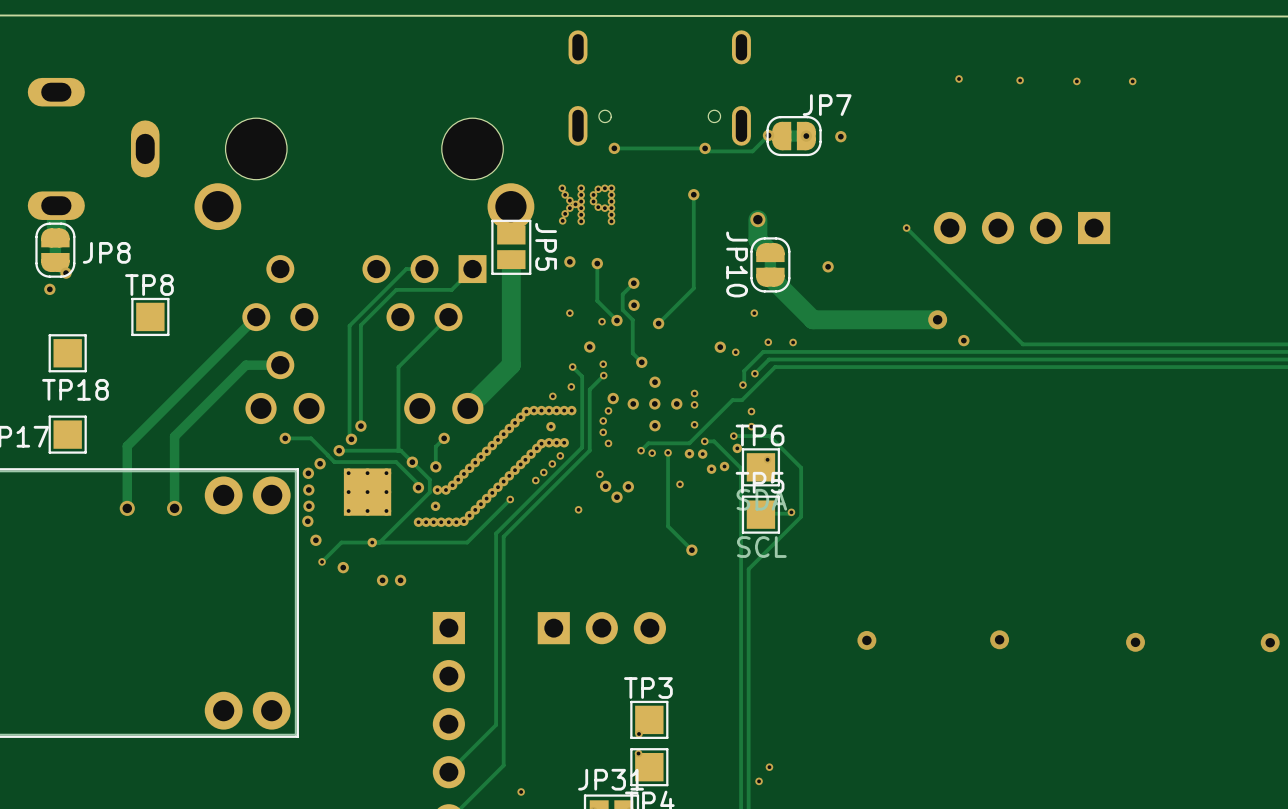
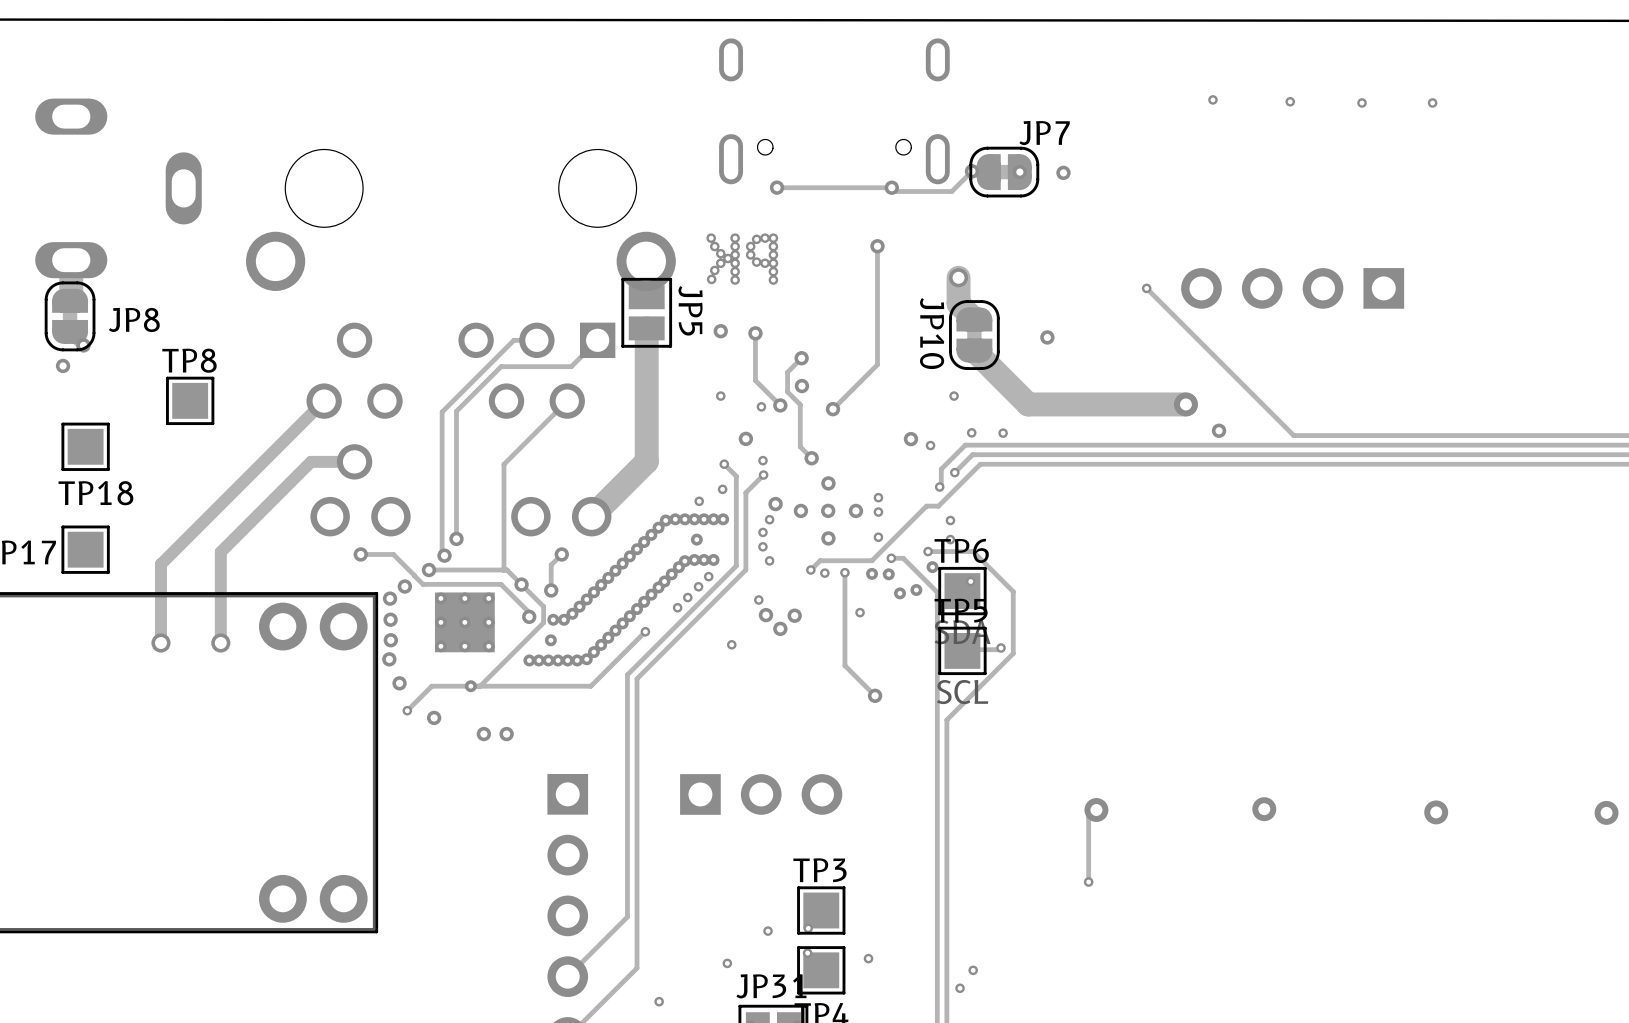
track: none -> (1096, 810) (1088, 817) (1088, 882)
via: none -> (1088, 882)
via: none -> (768, 931)
via: none -> (868, 958)
via: none -> (727, 963)

